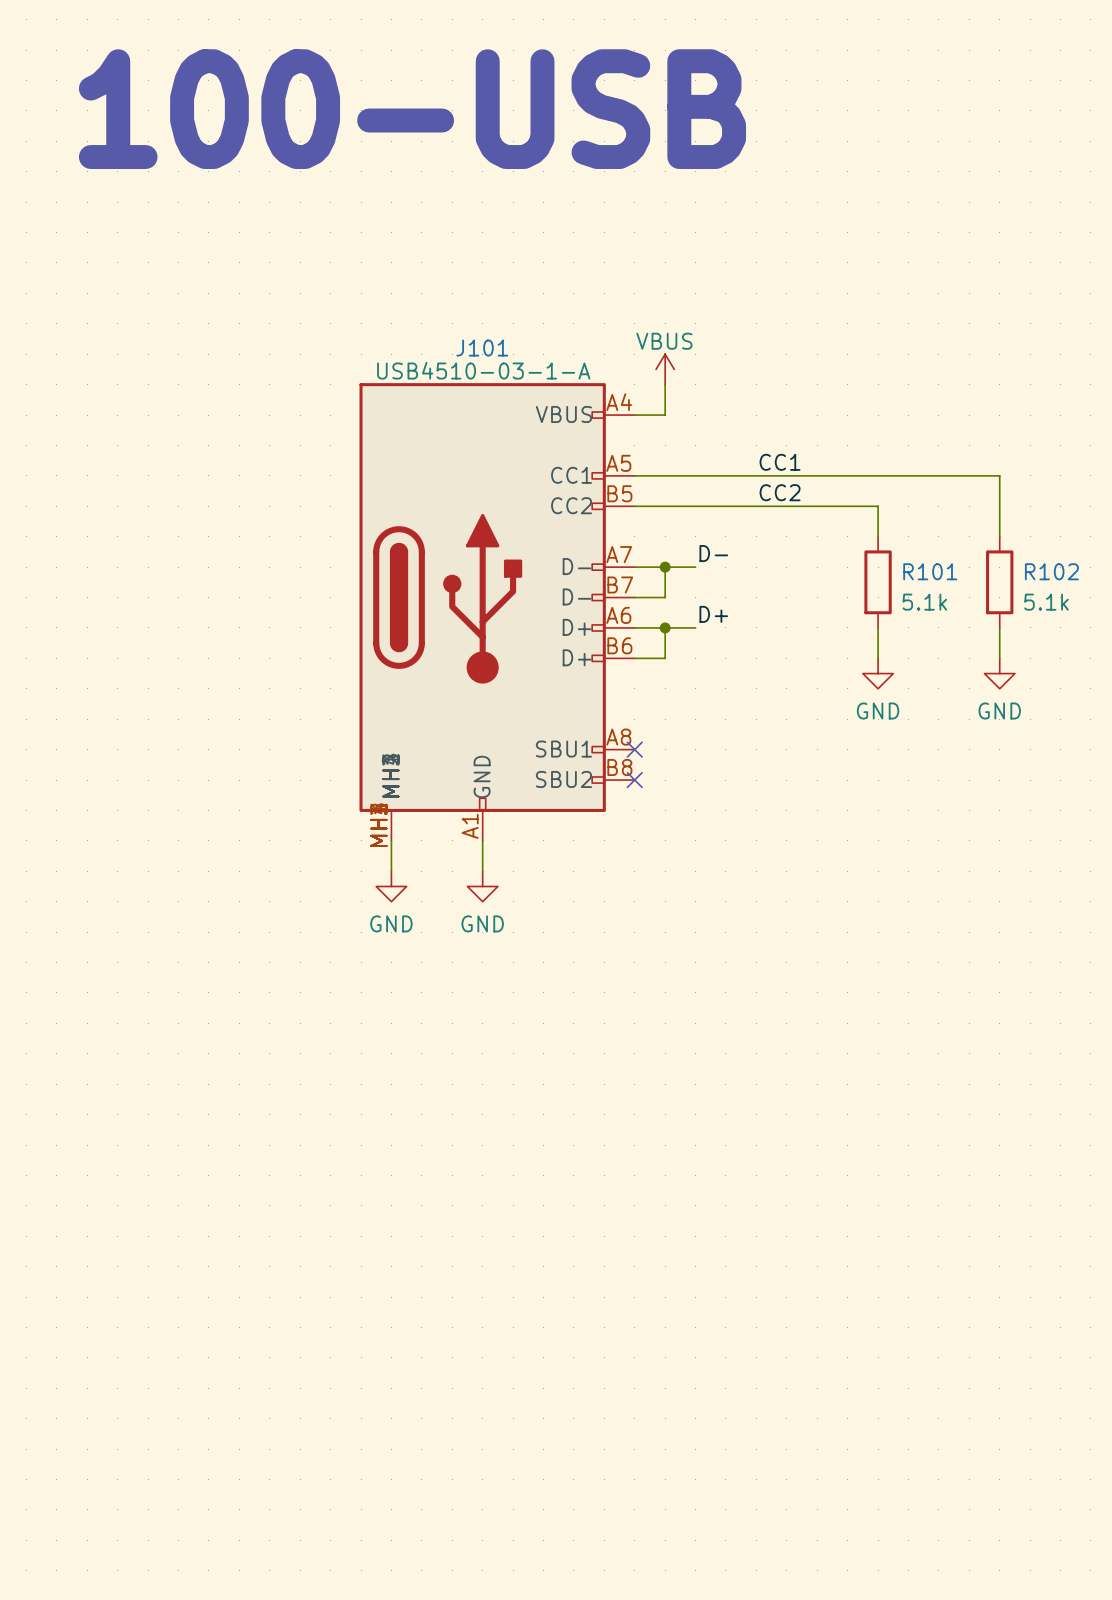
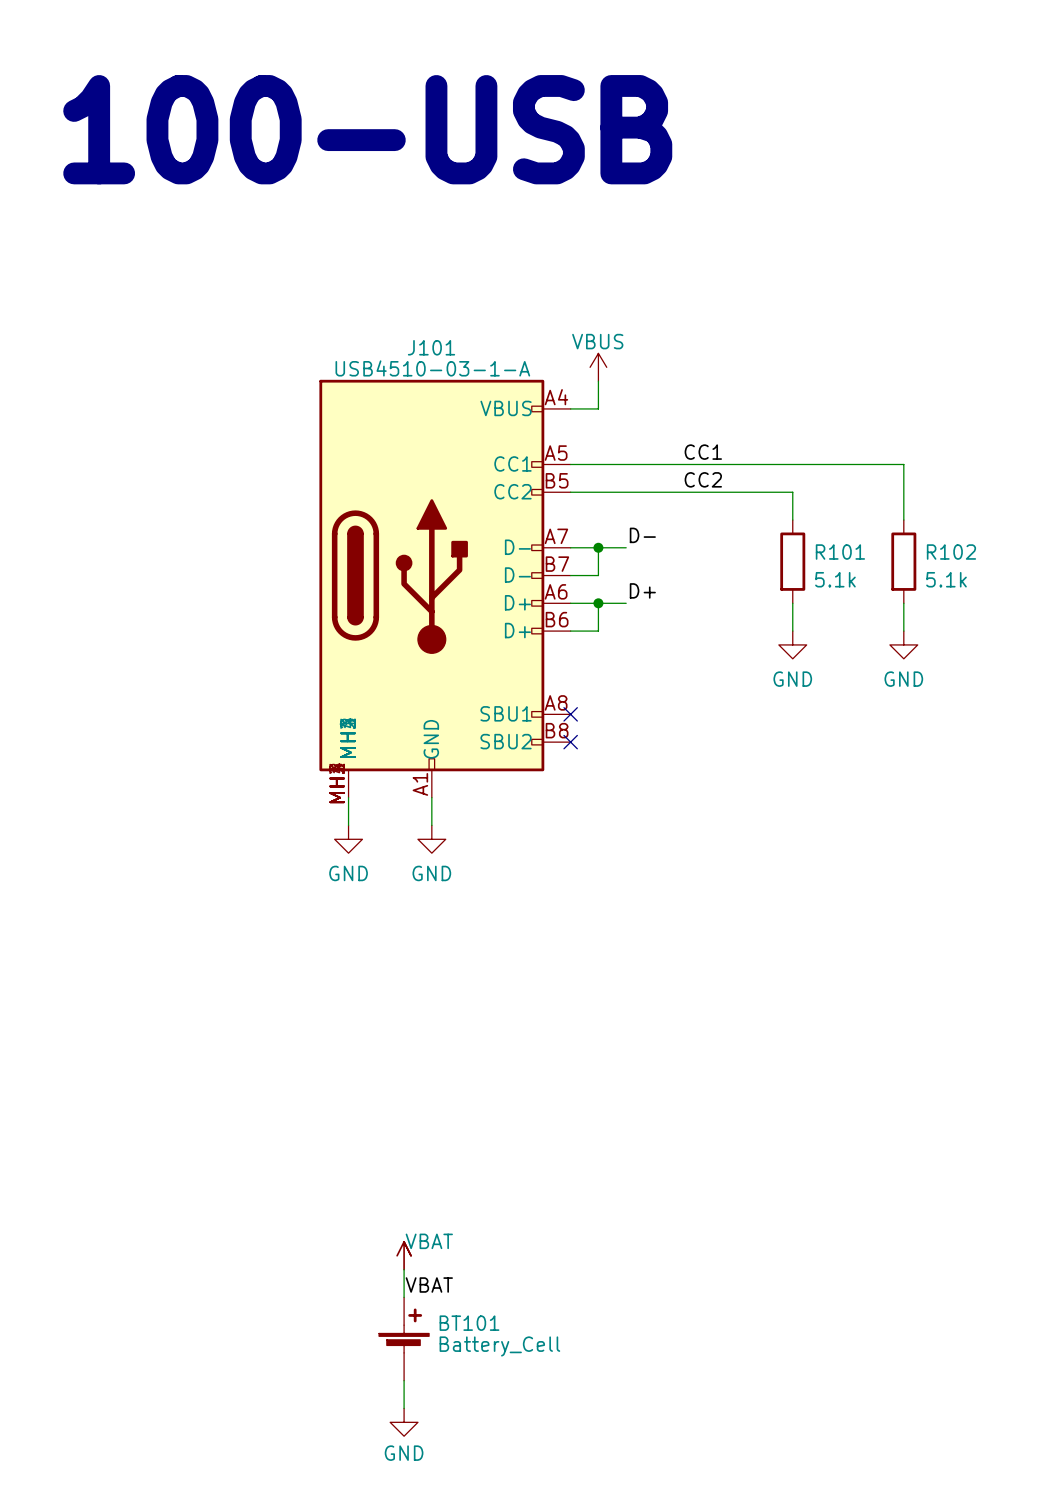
power symbol: none -> VBAT (404, 1255)
wire: none -> (404, 1269) (404, 1297)
label: none -> VBAT (429, 1285)
BT101: none -> Battery_Cell (404, 1339)
wire: none -> (404, 1380) (404, 1408)
power symbol: none -> GND (404, 1422)

